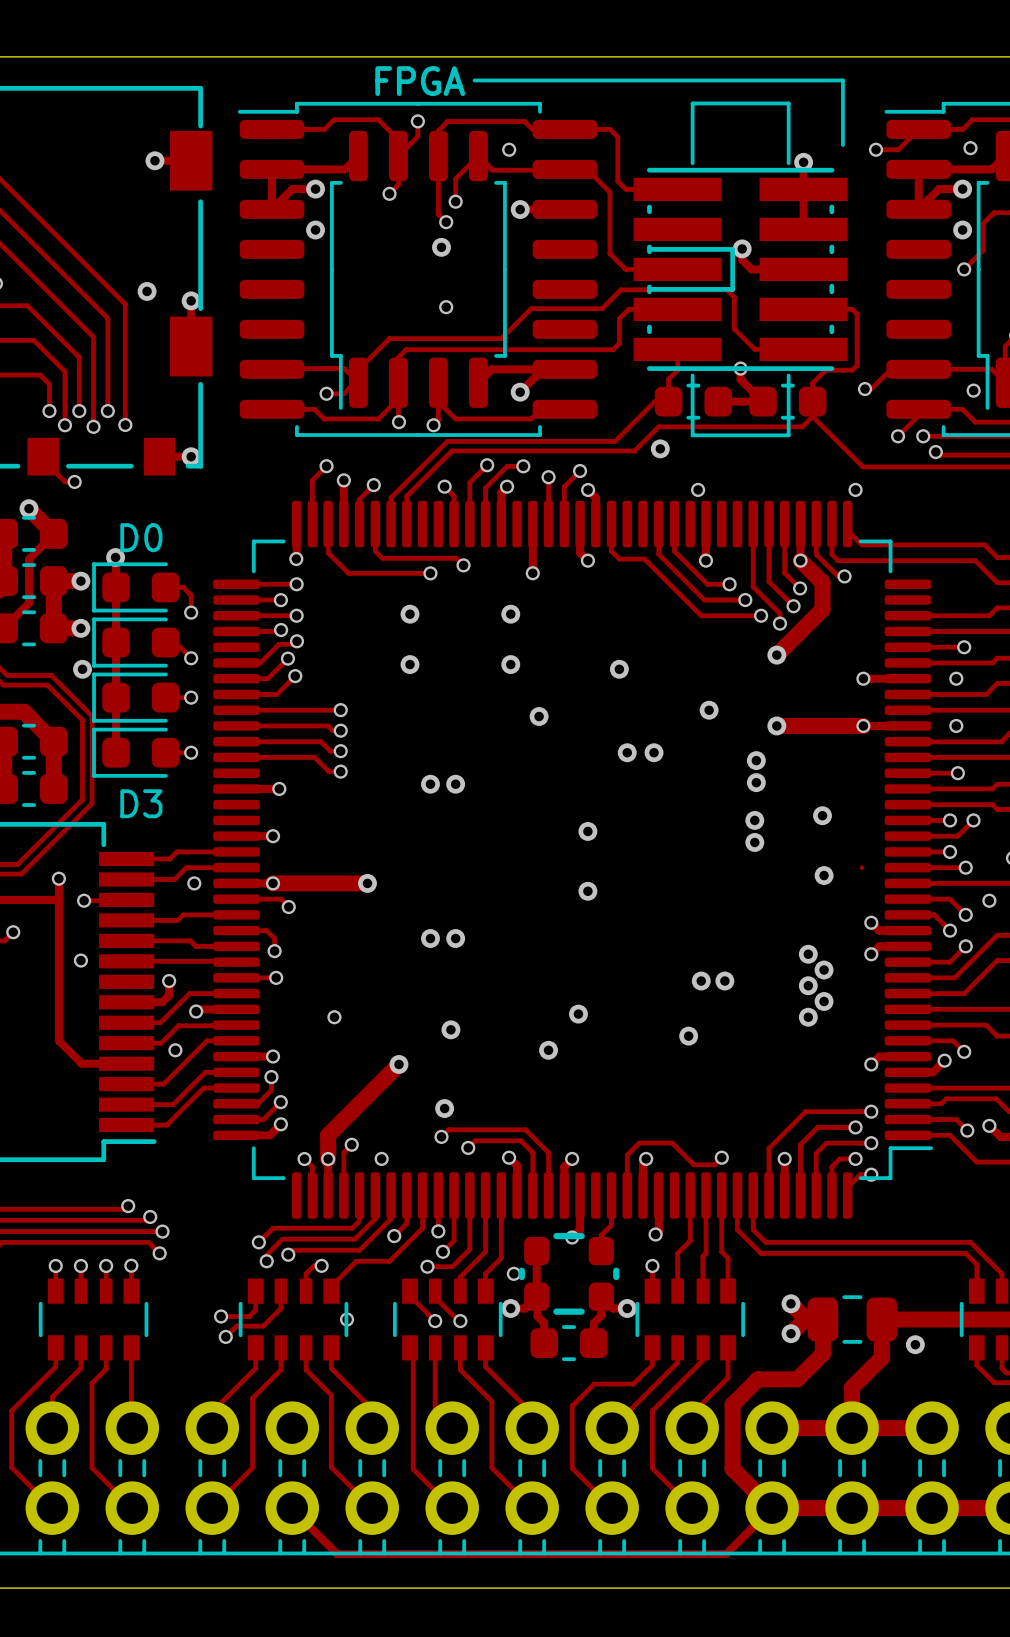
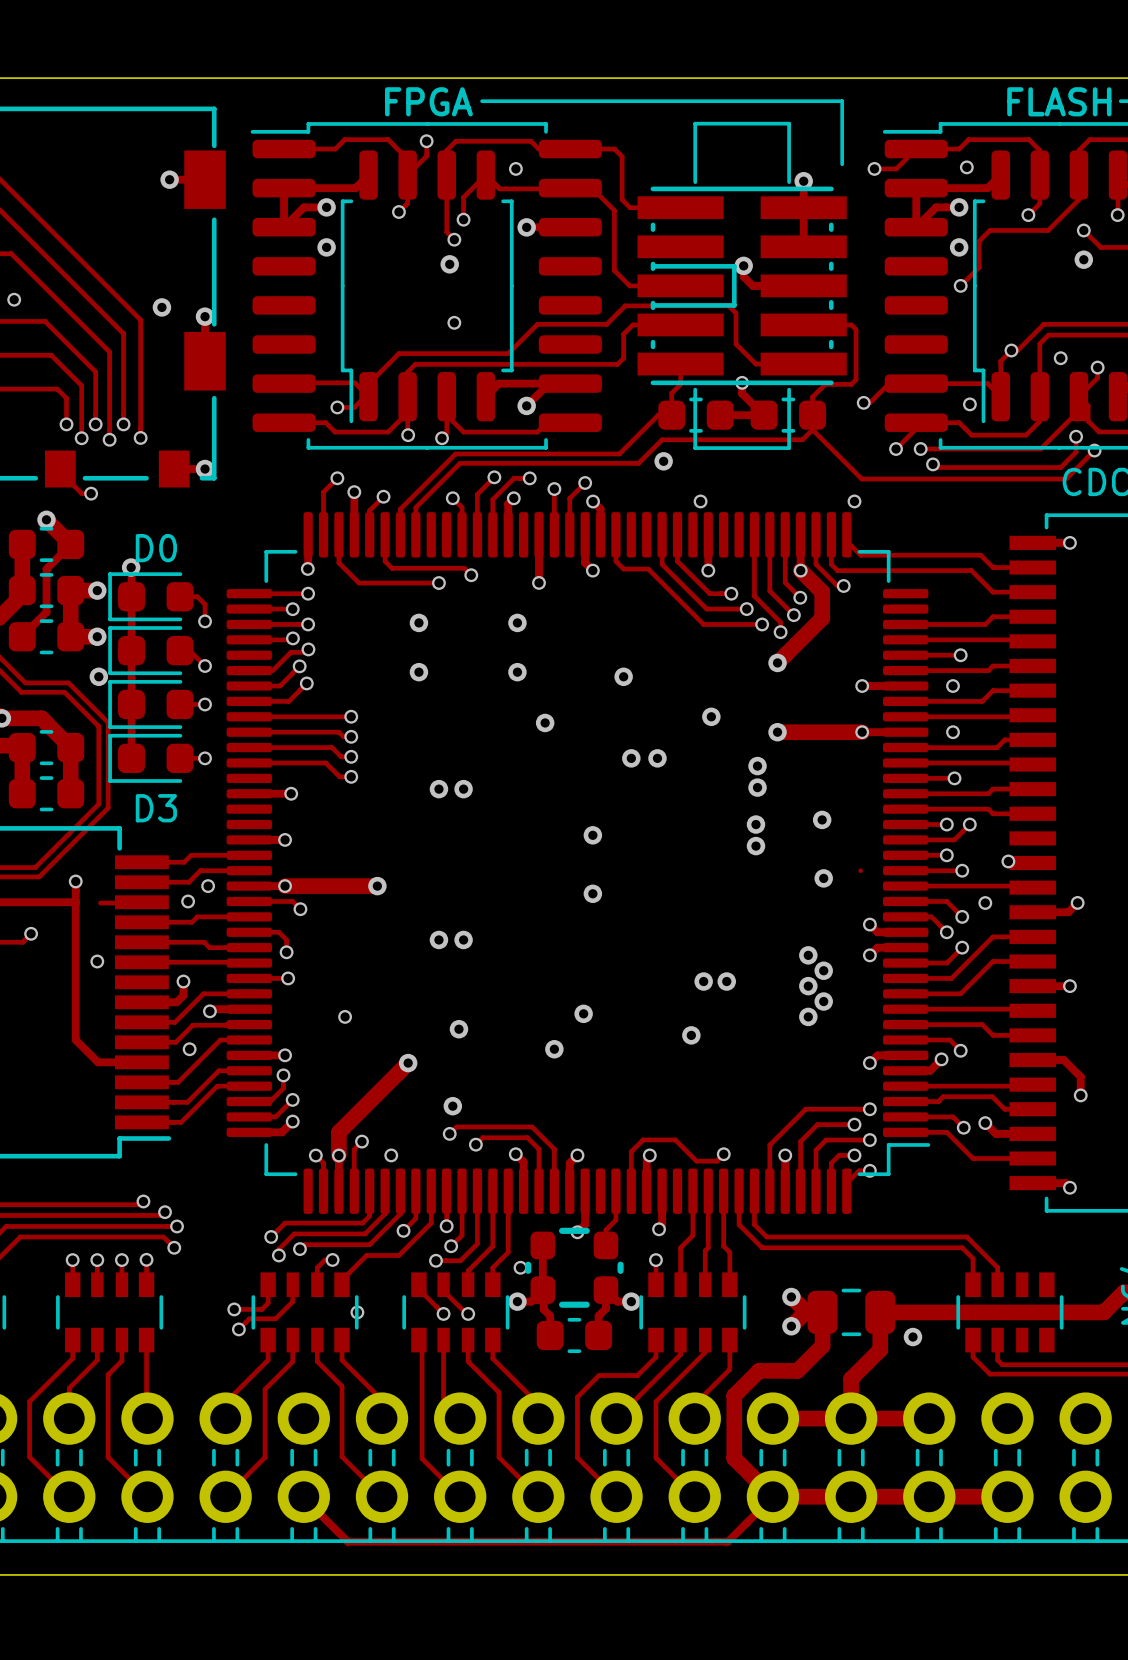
via: none -> (188, 901)
via: (84, 900) -> none

